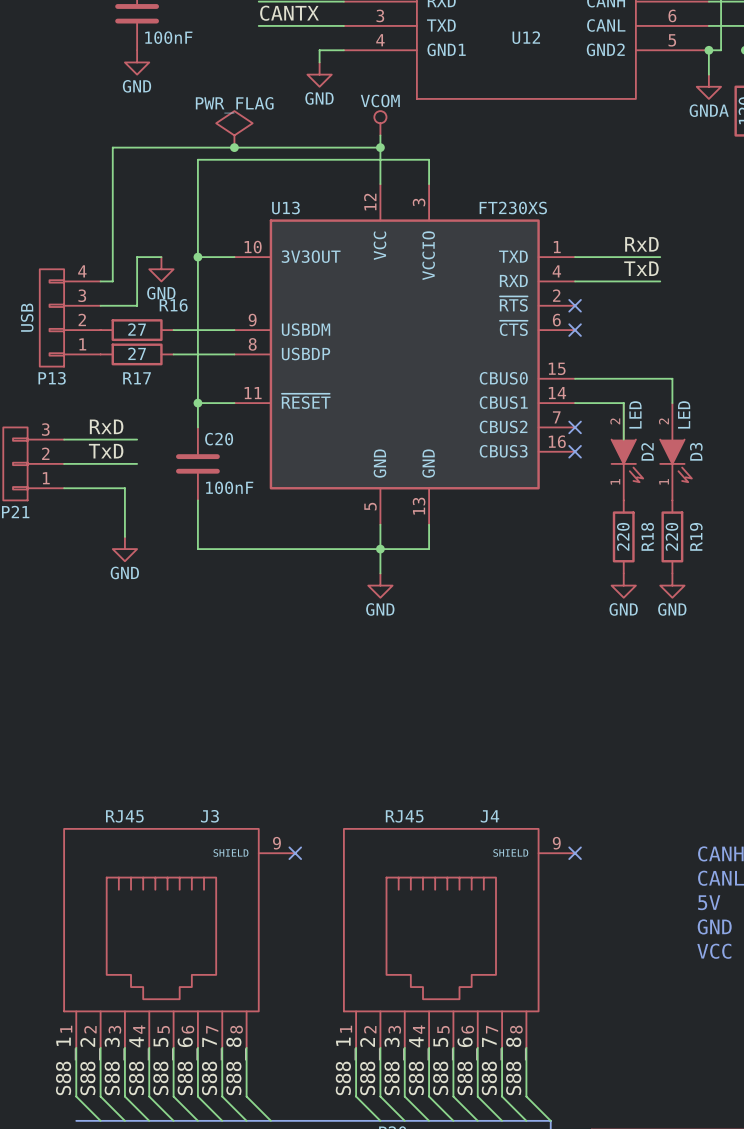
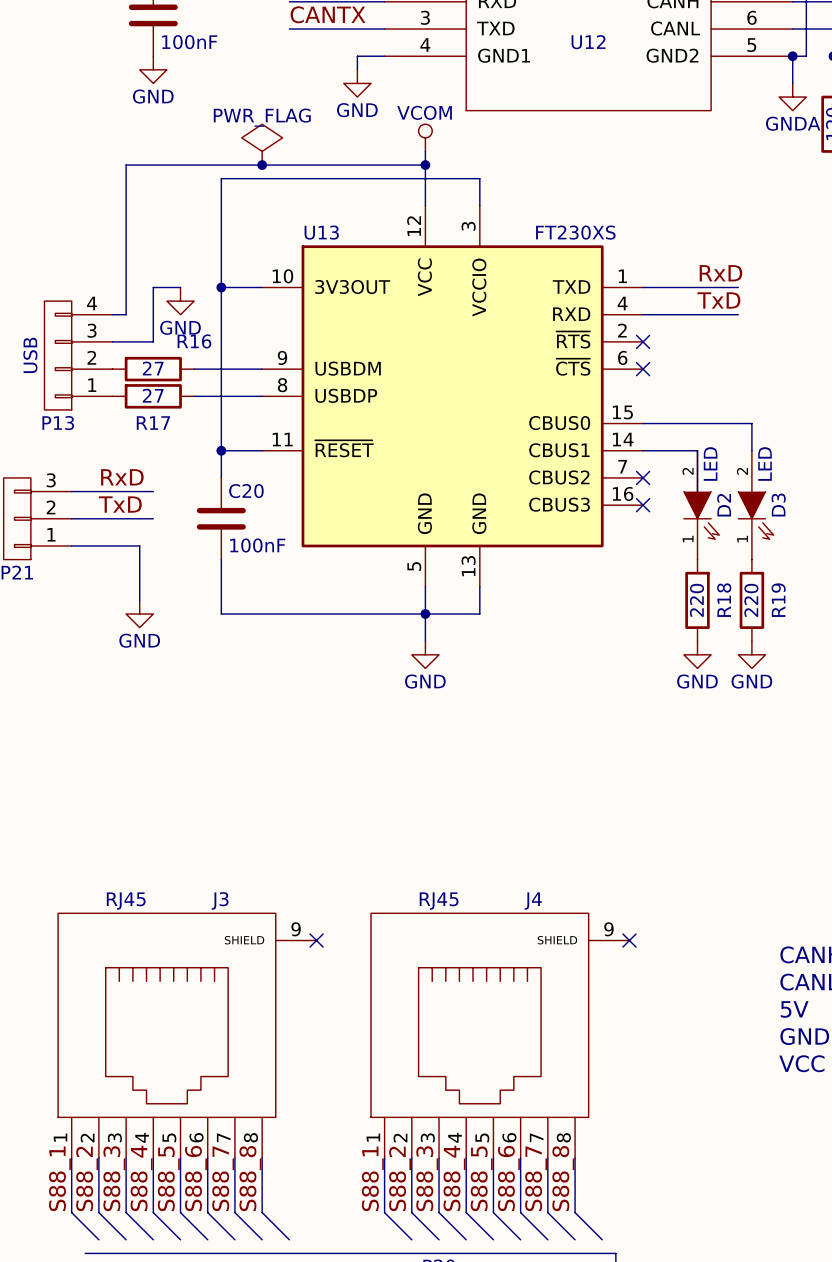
no-connect mark position: (295, 853) -> (316, 940)
no-connect mark position: (575, 853) -> (629, 940)
J3 position: (179, 938) -> (187, 1035)
J4 position: (459, 938) -> (500, 1035)
wire: (76, 1047) (76, 1096) -> (71, 1158) (71, 1212) (85, 1226)
wire: (100, 1047) (100, 1096) -> (98, 1158) (98, 1212) (112, 1226)
wire: (124, 1047) (124, 1096) -> (126, 1158) (126, 1212) (139, 1226)
wire: (149, 1047) (149, 1096) -> (153, 1158) (153, 1212) (166, 1226)
wire: (173, 1047) (173, 1096) -> (180, 1158) (180, 1212) (194, 1226)
wire: (197, 1047) (197, 1096) -> (207, 1158) (207, 1212) (221, 1226)
wire: (222, 1047) (222, 1096) -> (234, 1158) (234, 1212) (248, 1226)
wire: (246, 1047) (246, 1096) -> (262, 1158) (262, 1212) (275, 1226)
wire: (356, 1047) (356, 1096) -> (384, 1158) (384, 1212) (398, 1226)
wire: (380, 1047) (380, 1096) -> (411, 1158) (411, 1212) (425, 1226)
wire: (404, 1047) (404, 1096) -> (439, 1158) (439, 1212) (452, 1226)
wire: (429, 1047) (429, 1096) -> (466, 1158) (466, 1212) (479, 1226)
wire: (453, 1047) (453, 1096) -> (493, 1158) (493, 1212) (507, 1226)
wire: (477, 1047) (477, 1096) -> (520, 1158) (520, 1212) (534, 1226)
wire: (502, 1047) (502, 1096) -> (547, 1158) (547, 1212) (561, 1226)
wire: (526, 1047) (526, 1096) -> (575, 1158) (575, 1212) (588, 1226)
label position: S88_1 (65, 1066) -> S88_1 (59, 1178)
label position: S88_2 (90, 1066) -> S88_2 (87, 1178)
label position: S88_3 (114, 1066) -> S88_3 (114, 1178)
label position: S88_4 (138, 1066) -> S88_4 (141, 1178)
label position: S88_5 (163, 1066) -> S88_5 (168, 1178)
label position: S88_6 (187, 1066) -> S88_6 (195, 1178)
label position: S88_7 (211, 1066) -> S88_7 (223, 1178)
label position: S88_8 (236, 1066) -> S88_8 (250, 1178)
label position: S88_1 (345, 1066) -> S88_1 (372, 1178)
label position: S88_2 (369, 1066) -> S88_2 (400, 1178)
label position: S88_3 (394, 1066) -> S88_3 (427, 1178)
label position: S88_4 (418, 1066) -> S88_4 (454, 1178)
label position: S88_5 (442, 1066) -> S88_5 (481, 1178)
label position: S88_6 (467, 1066) -> S88_6 (508, 1178)
label position: S88_7 (491, 1066) -> S88_7 (536, 1178)
label position: S88_8 (515, 1066) -> S88_8 (563, 1178)
wire: (88, 1108) (100, 1120) -> none
wire: (112, 1108) (124, 1120) -> none
wire: (137, 1108) (149, 1120) -> none
wire: (161, 1108) (173, 1120) -> none
wire: (185, 1108) (197, 1120) -> none
wire: (210, 1108) (222, 1120) -> none
wire: (234, 1108) (246, 1120) -> none
wire: (258, 1108) (270, 1120) -> none
wire: (368, 1108) (380, 1120) -> none
wire: (392, 1108) (404, 1120) -> none
wire: (416, 1108) (429, 1120) -> none
wire: (441, 1108) (453, 1120) -> none
wire: (465, 1108) (477, 1120) -> none
wire: (489, 1108) (502, 1120) -> none
wire: (514, 1108) (526, 1120) -> none
wire: (538, 1108) (550, 1120) -> none

